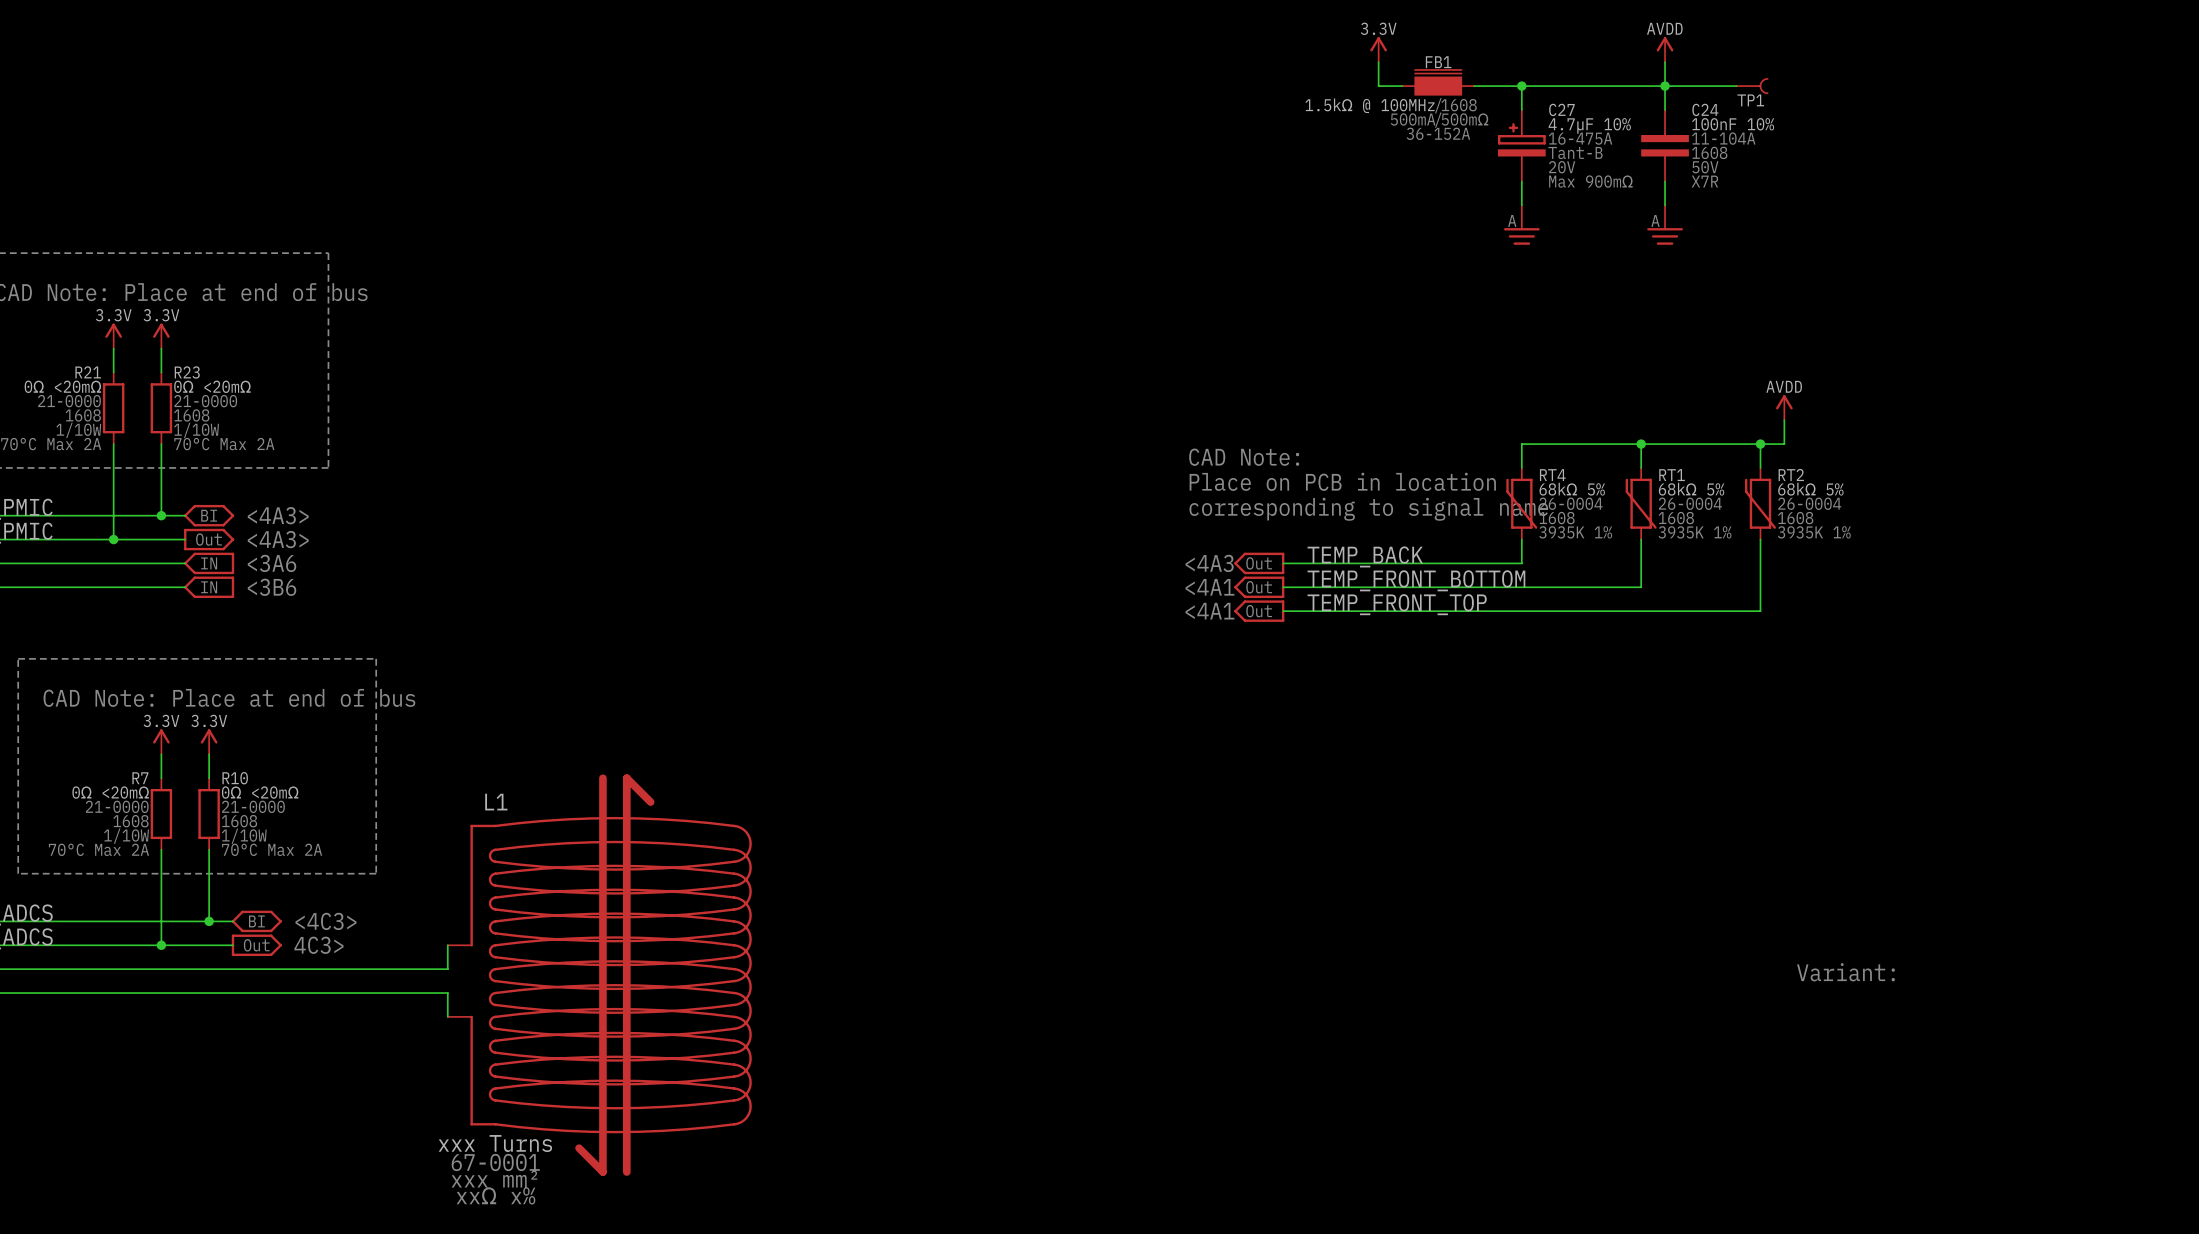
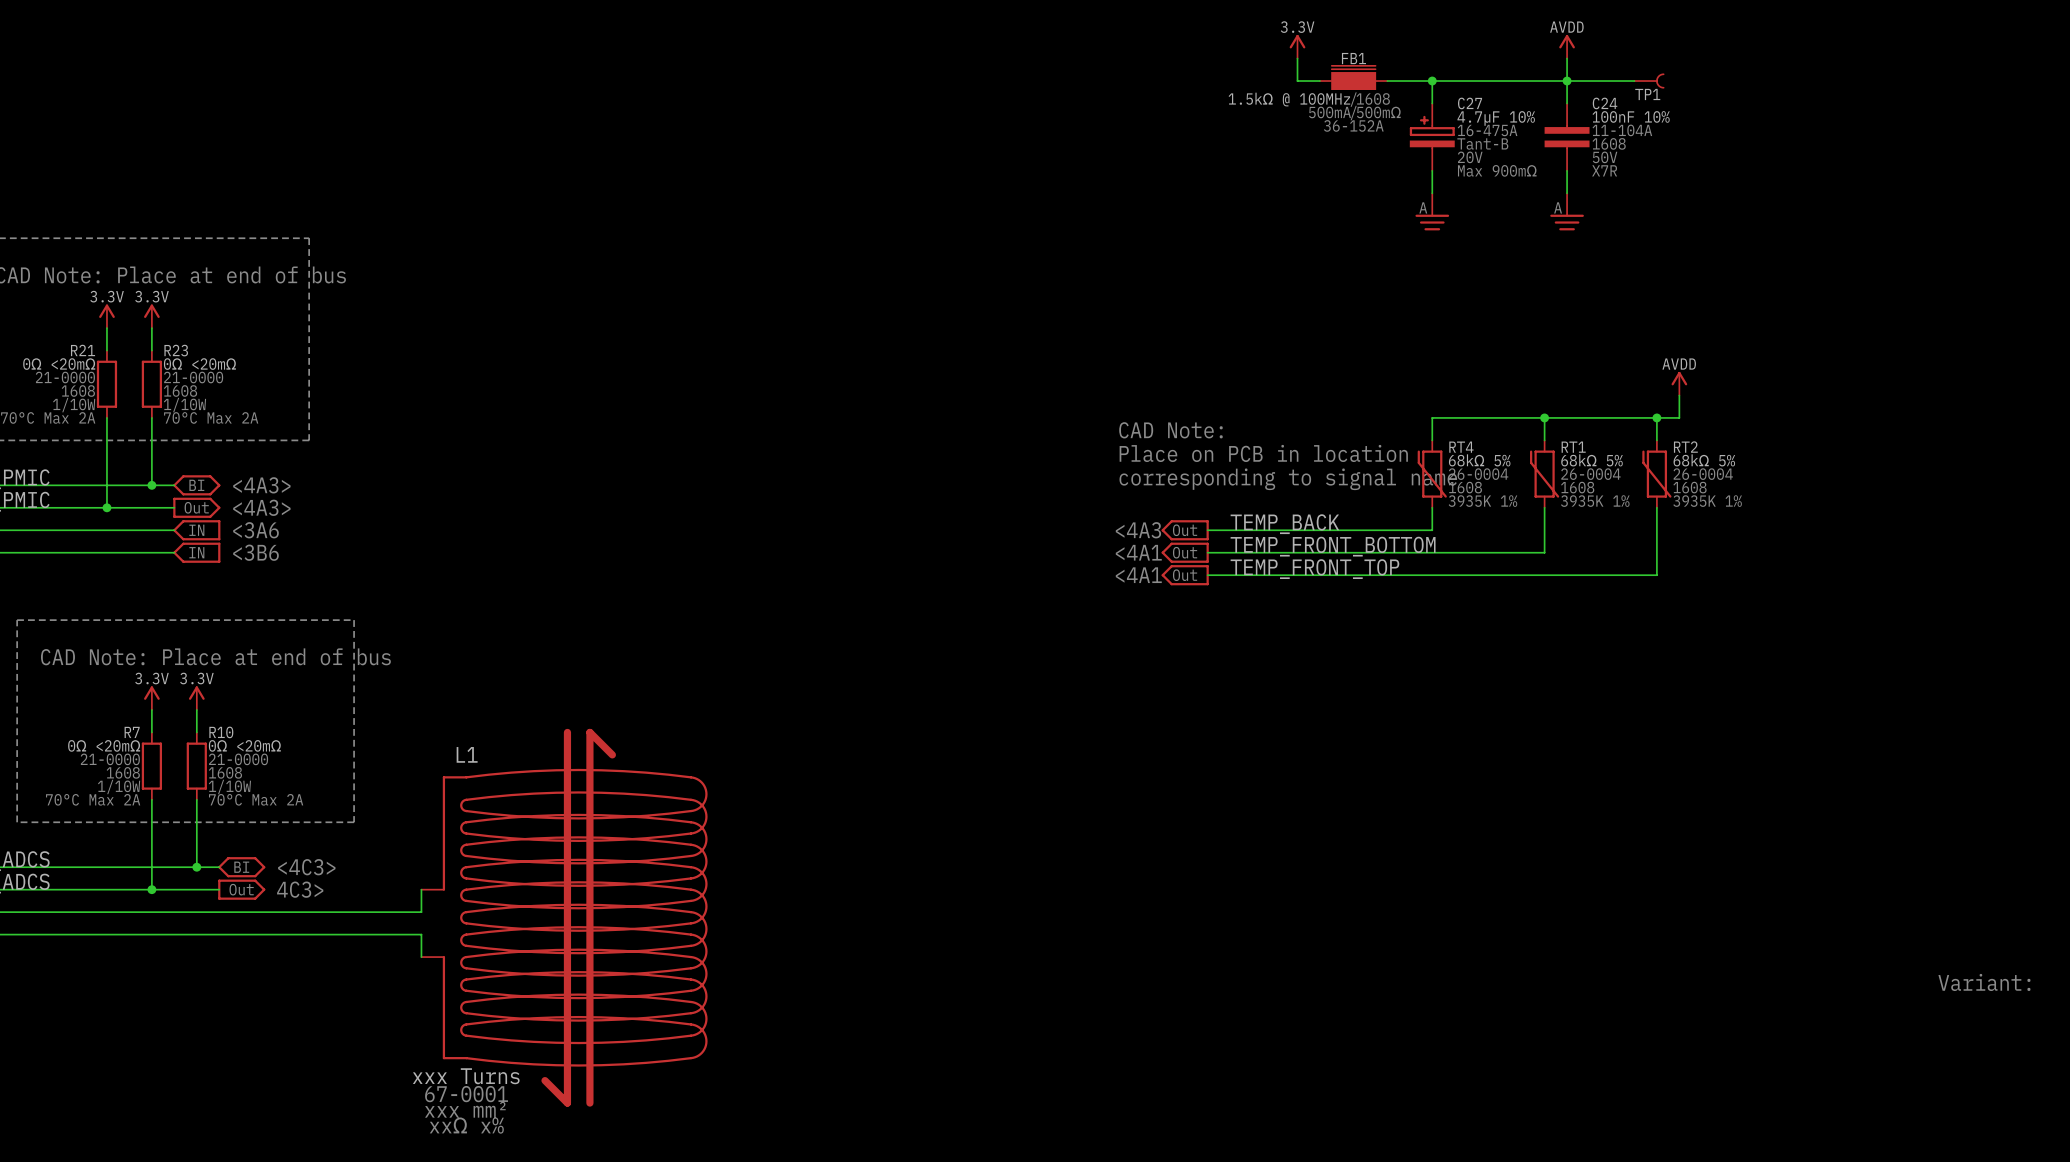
text: Variant: (1845, 972) -> none
text: none -> Variant: (1984, 982)

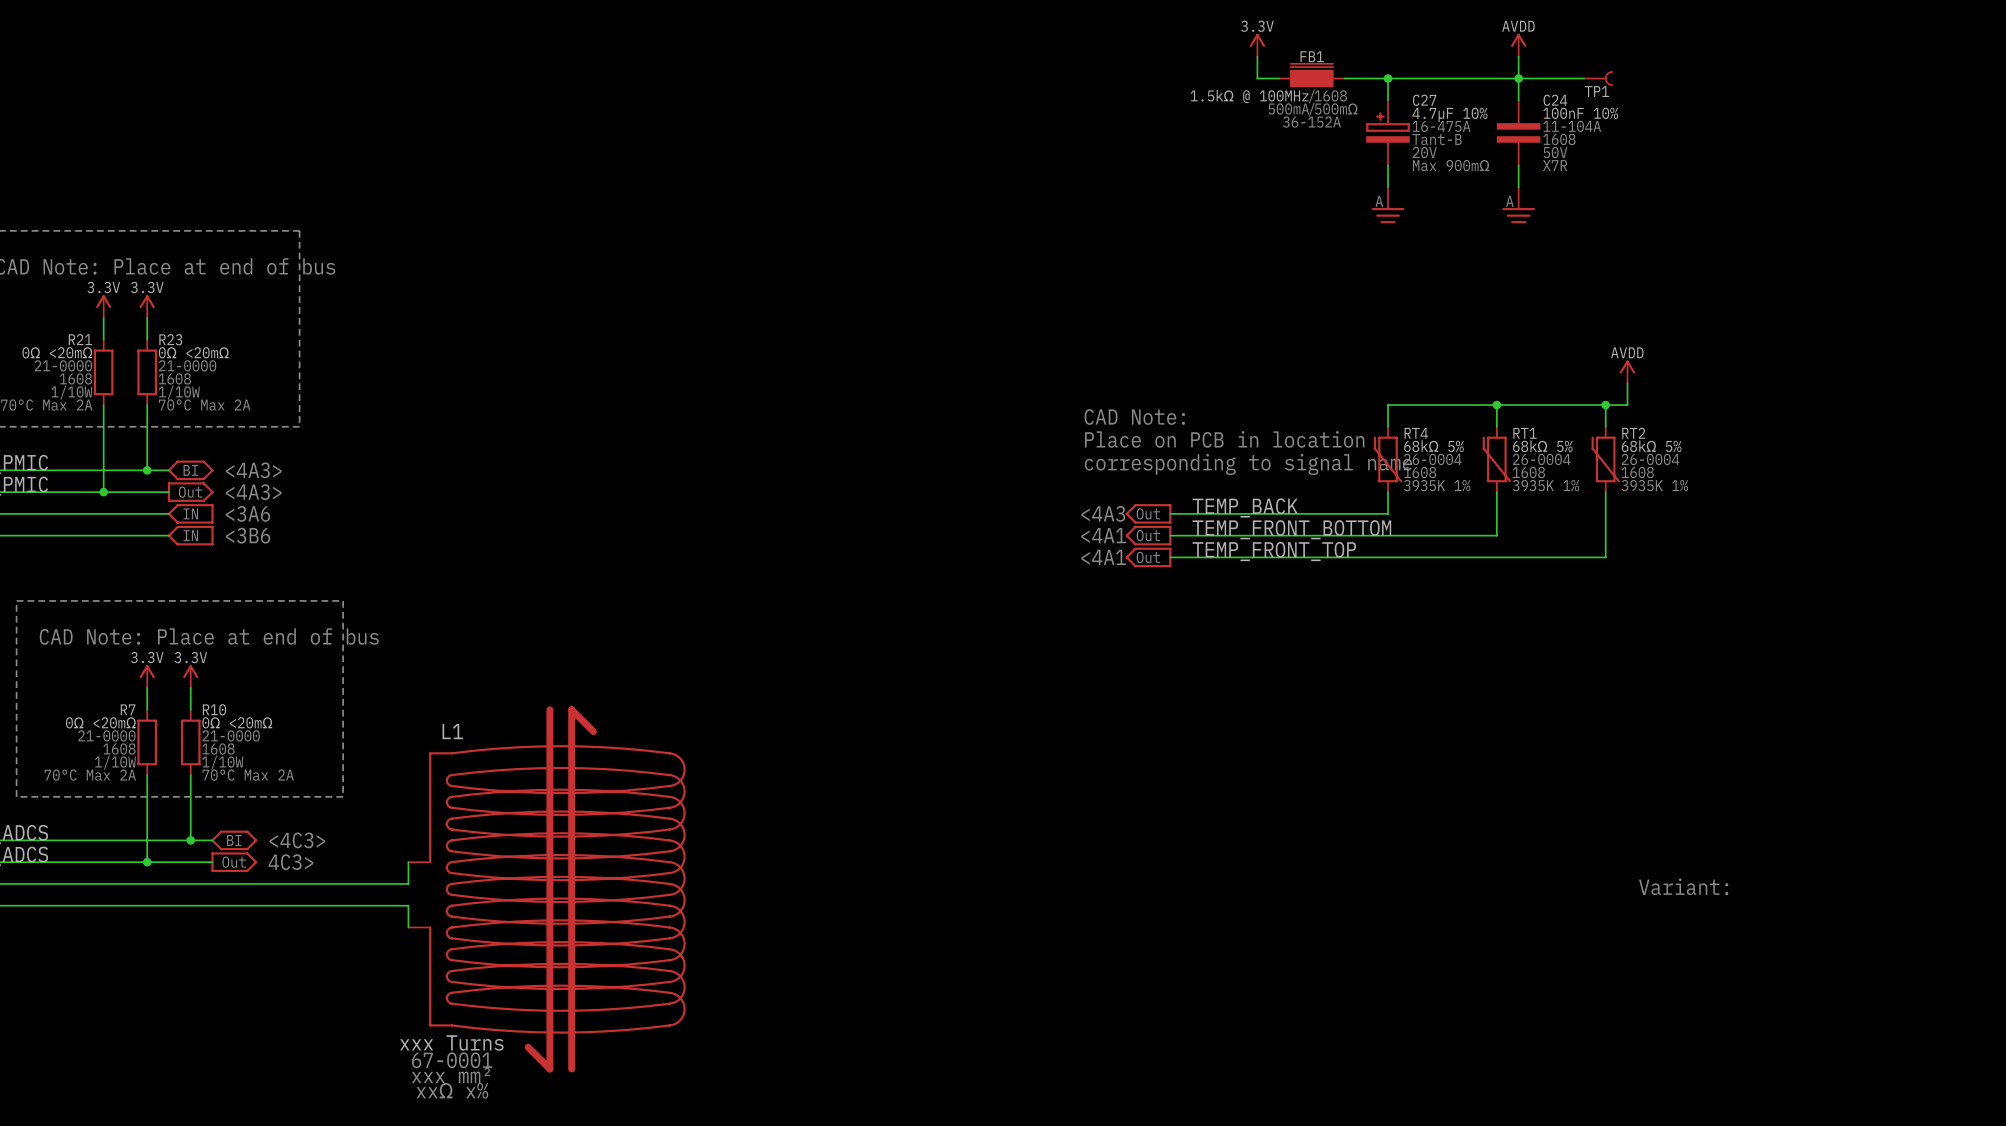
text: none -> Variant: (1683, 886)
text: Variant: (1984, 982) -> none

